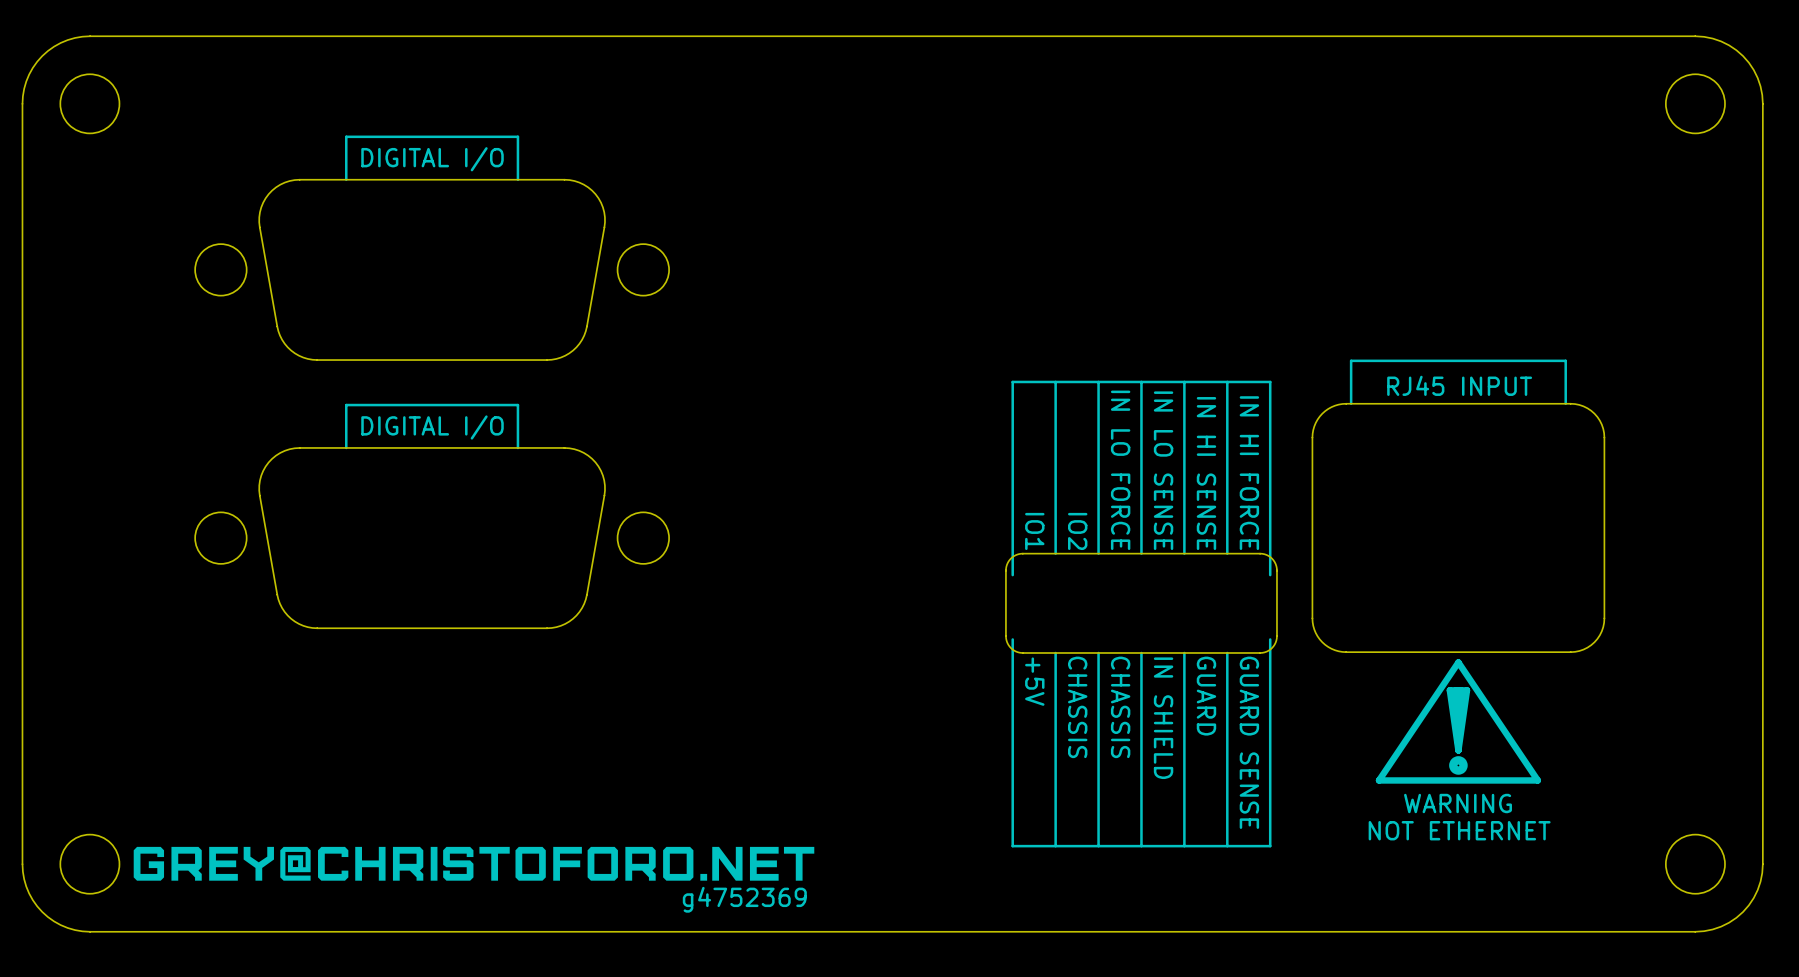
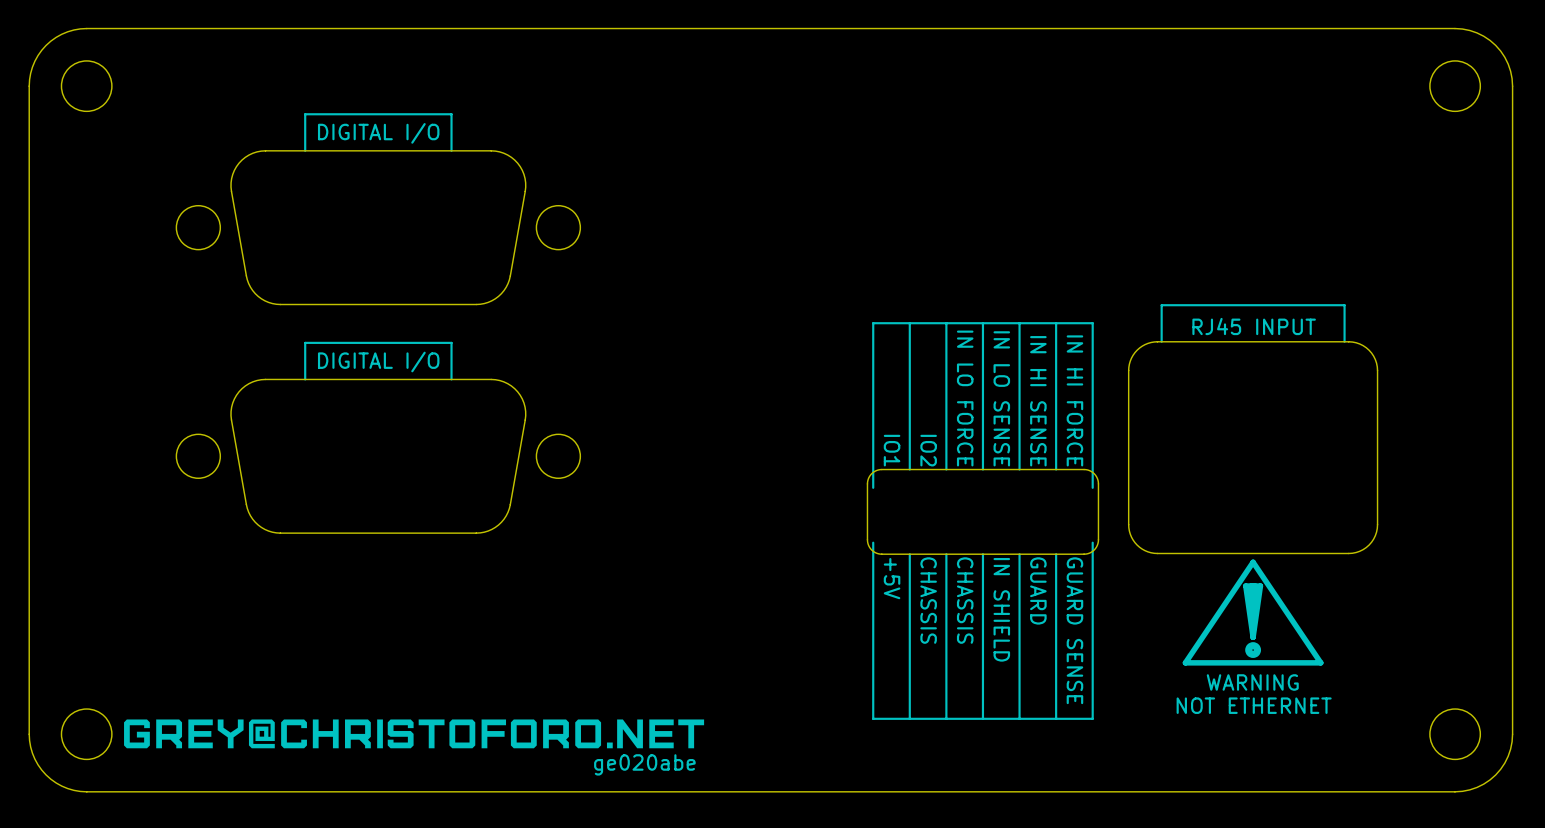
text: g4752369 (744, 899) -> ge020abe (644, 764)

